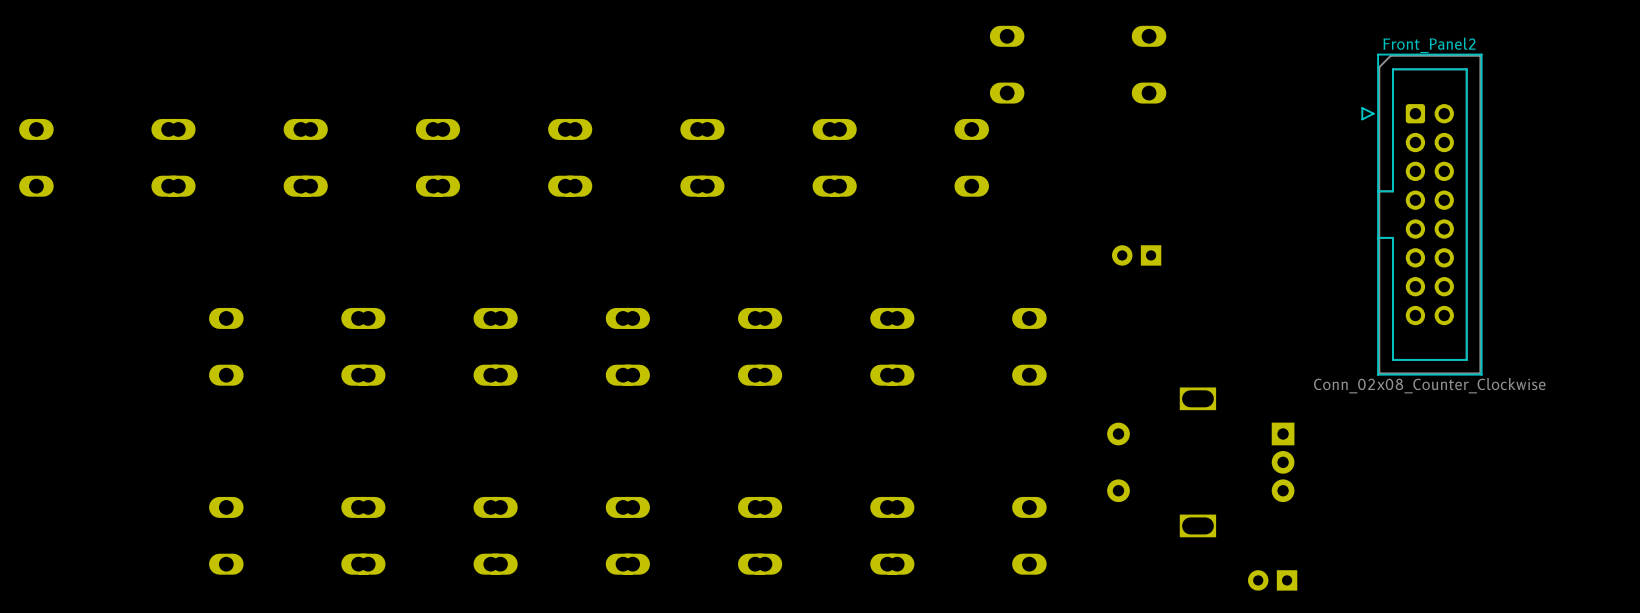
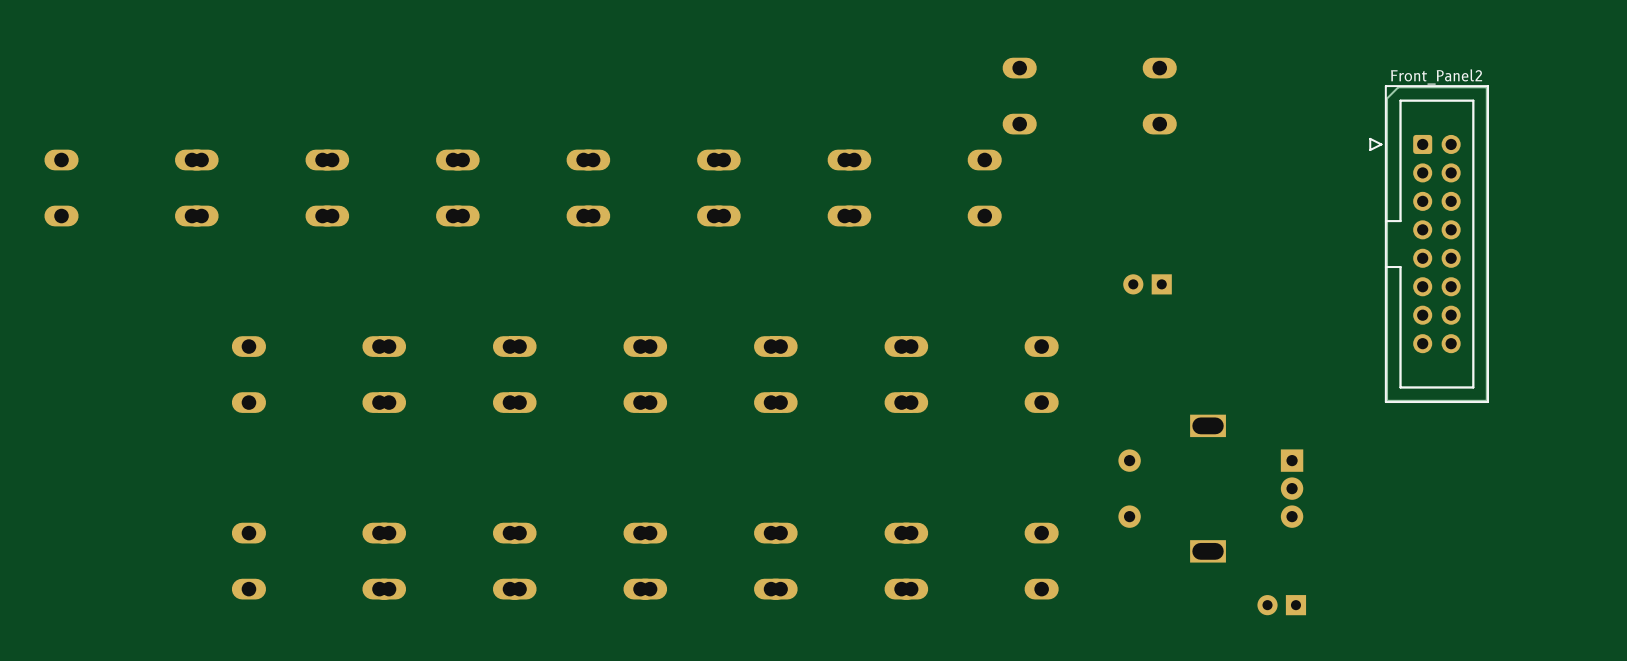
Front_Panel2 value: Conn_02x08_Counter_Clockwise (1429, 385) -> none

